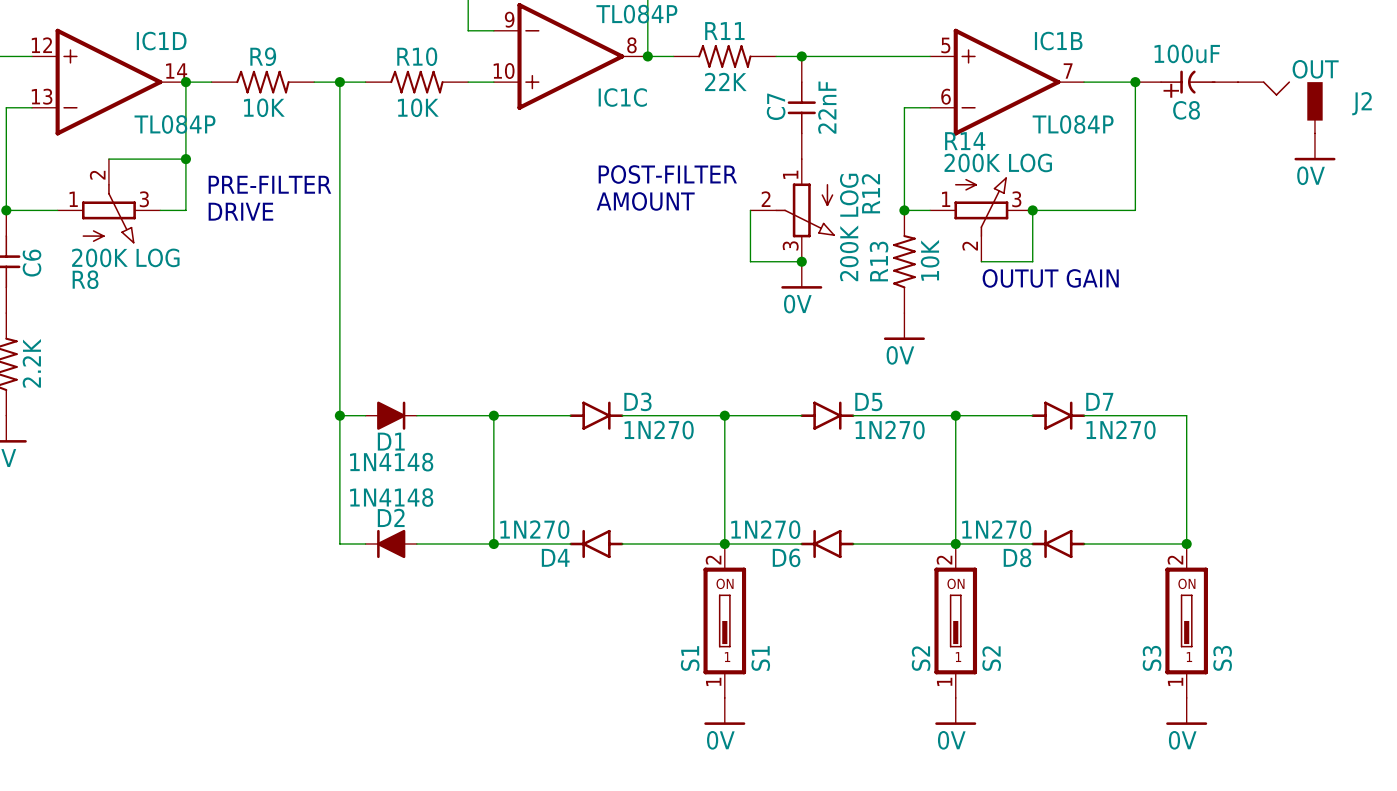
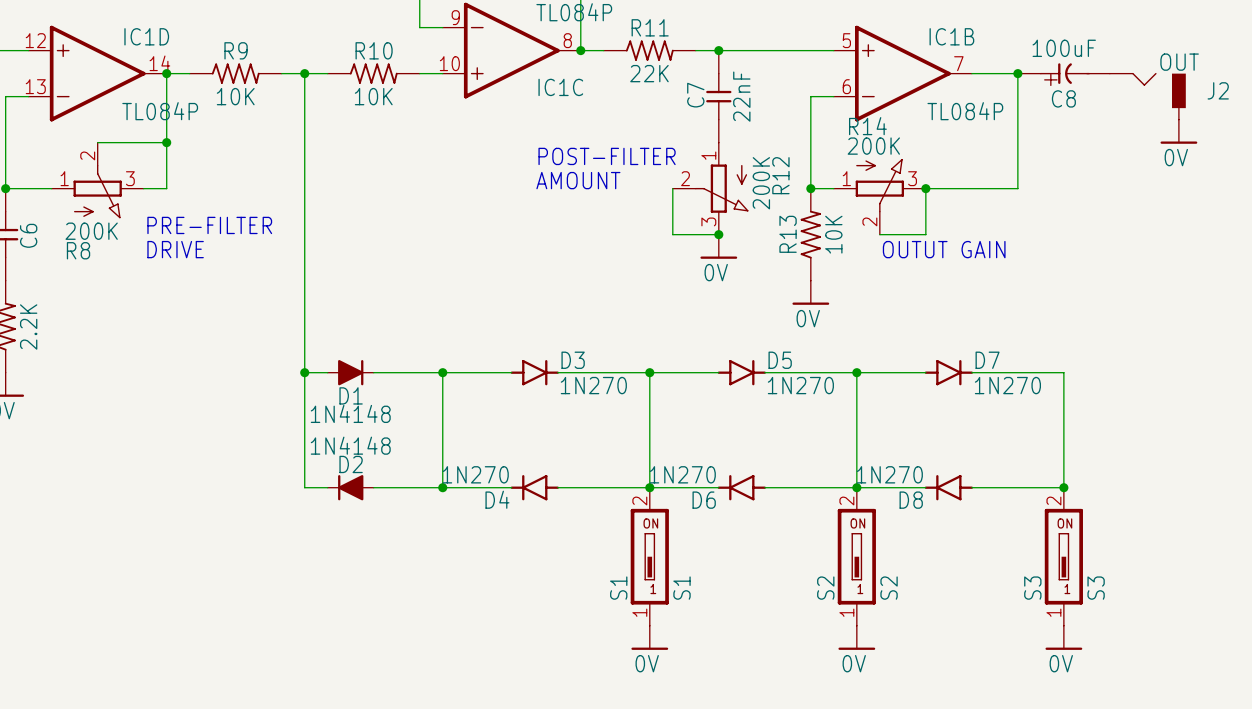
R14 value: 200K LOG (998, 162) -> 200K (873, 146)
text position: PRE-FILTER (269, 184) -> PRE-FILTER (209, 225)
text position: DRIVE (240, 211) -> DRIVE (175, 249)
R12 value: 200K LOG (849, 227) -> 200K (761, 183)
R8 value: 200K LOG (125, 257) -> 200K (91, 231)

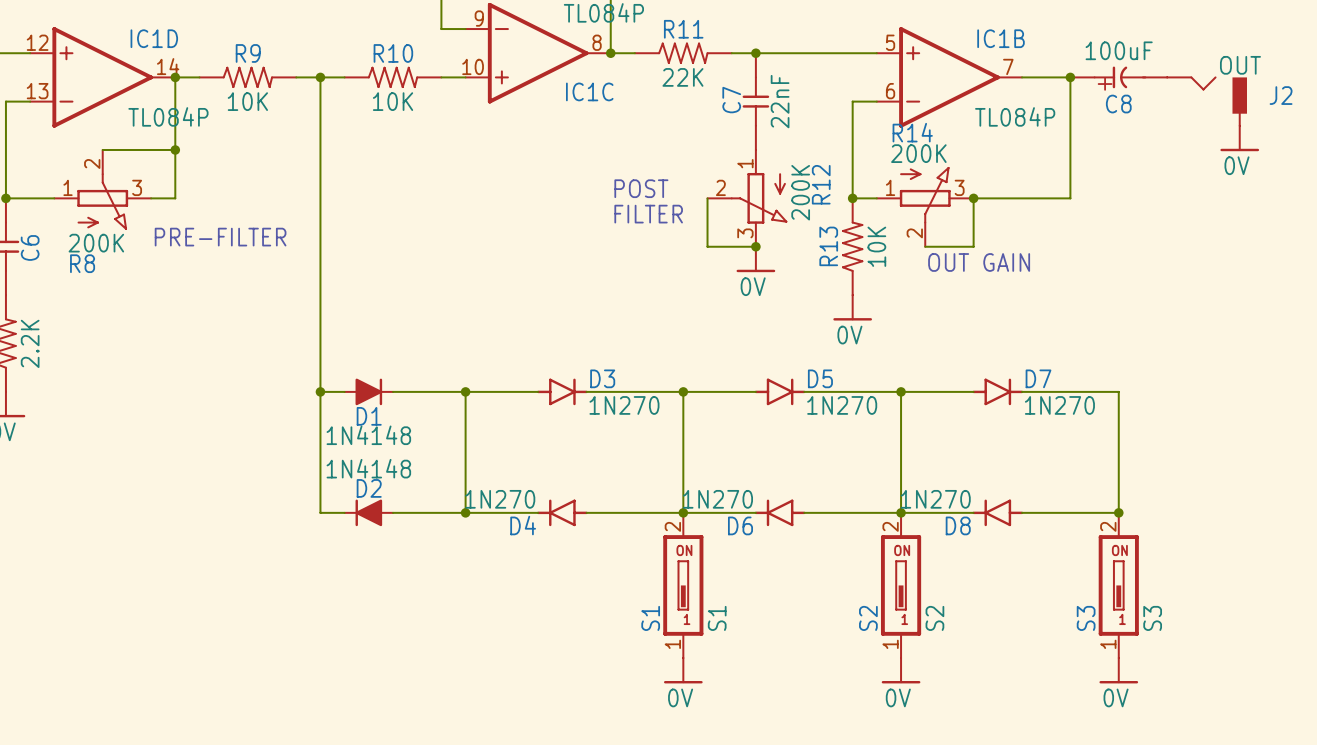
text: POST-FILTER (607, 156) -> none
text: none -> POST (641, 188)
text: AMOUNT (578, 180) -> none
text: none -> FILTER (648, 214)
text: DRIVE (175, 249) -> none
text: OUTUT GAIN (944, 249) -> OUT GAIN (979, 262)

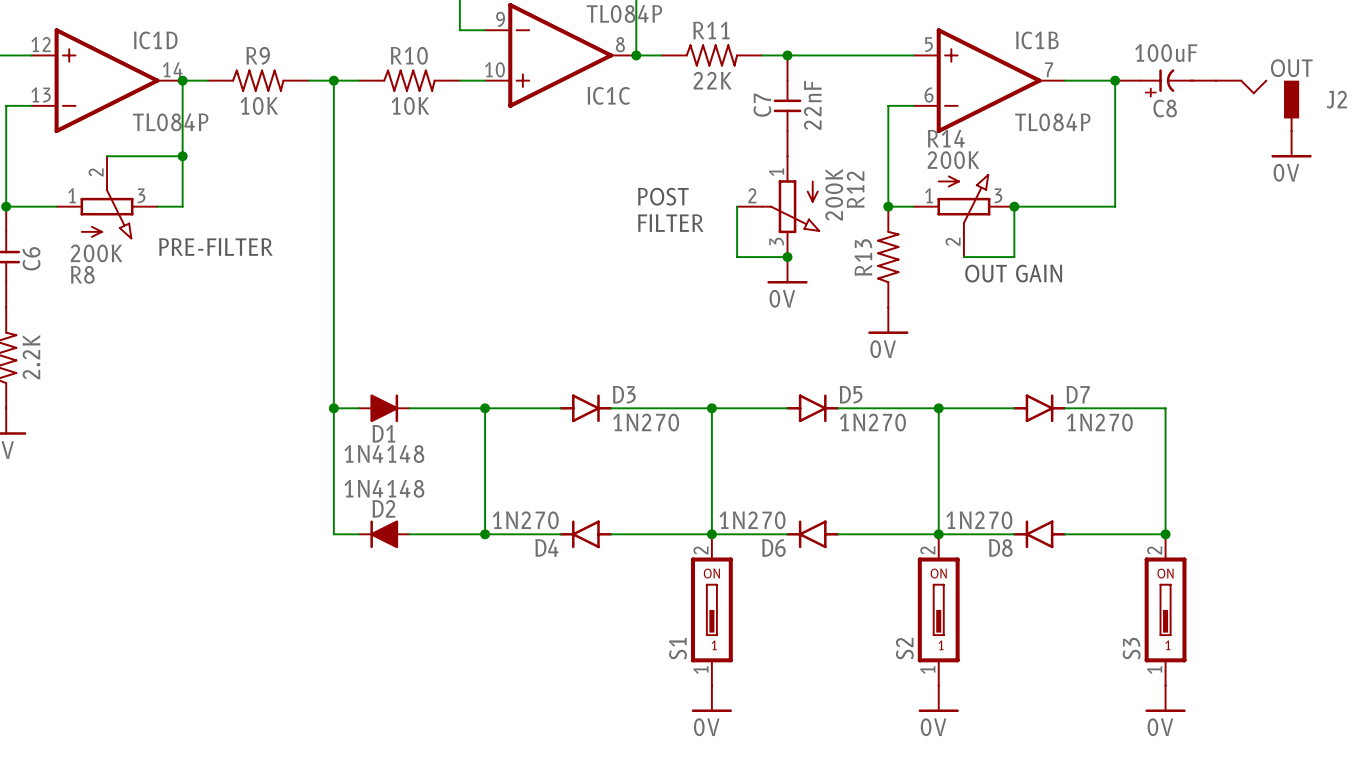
R13 value: 10K (876, 246) -> none
S1 value: S1 (717, 618) -> none
S2 value: S2 (934, 618) -> none
S3 value: S3 (1152, 618) -> none

